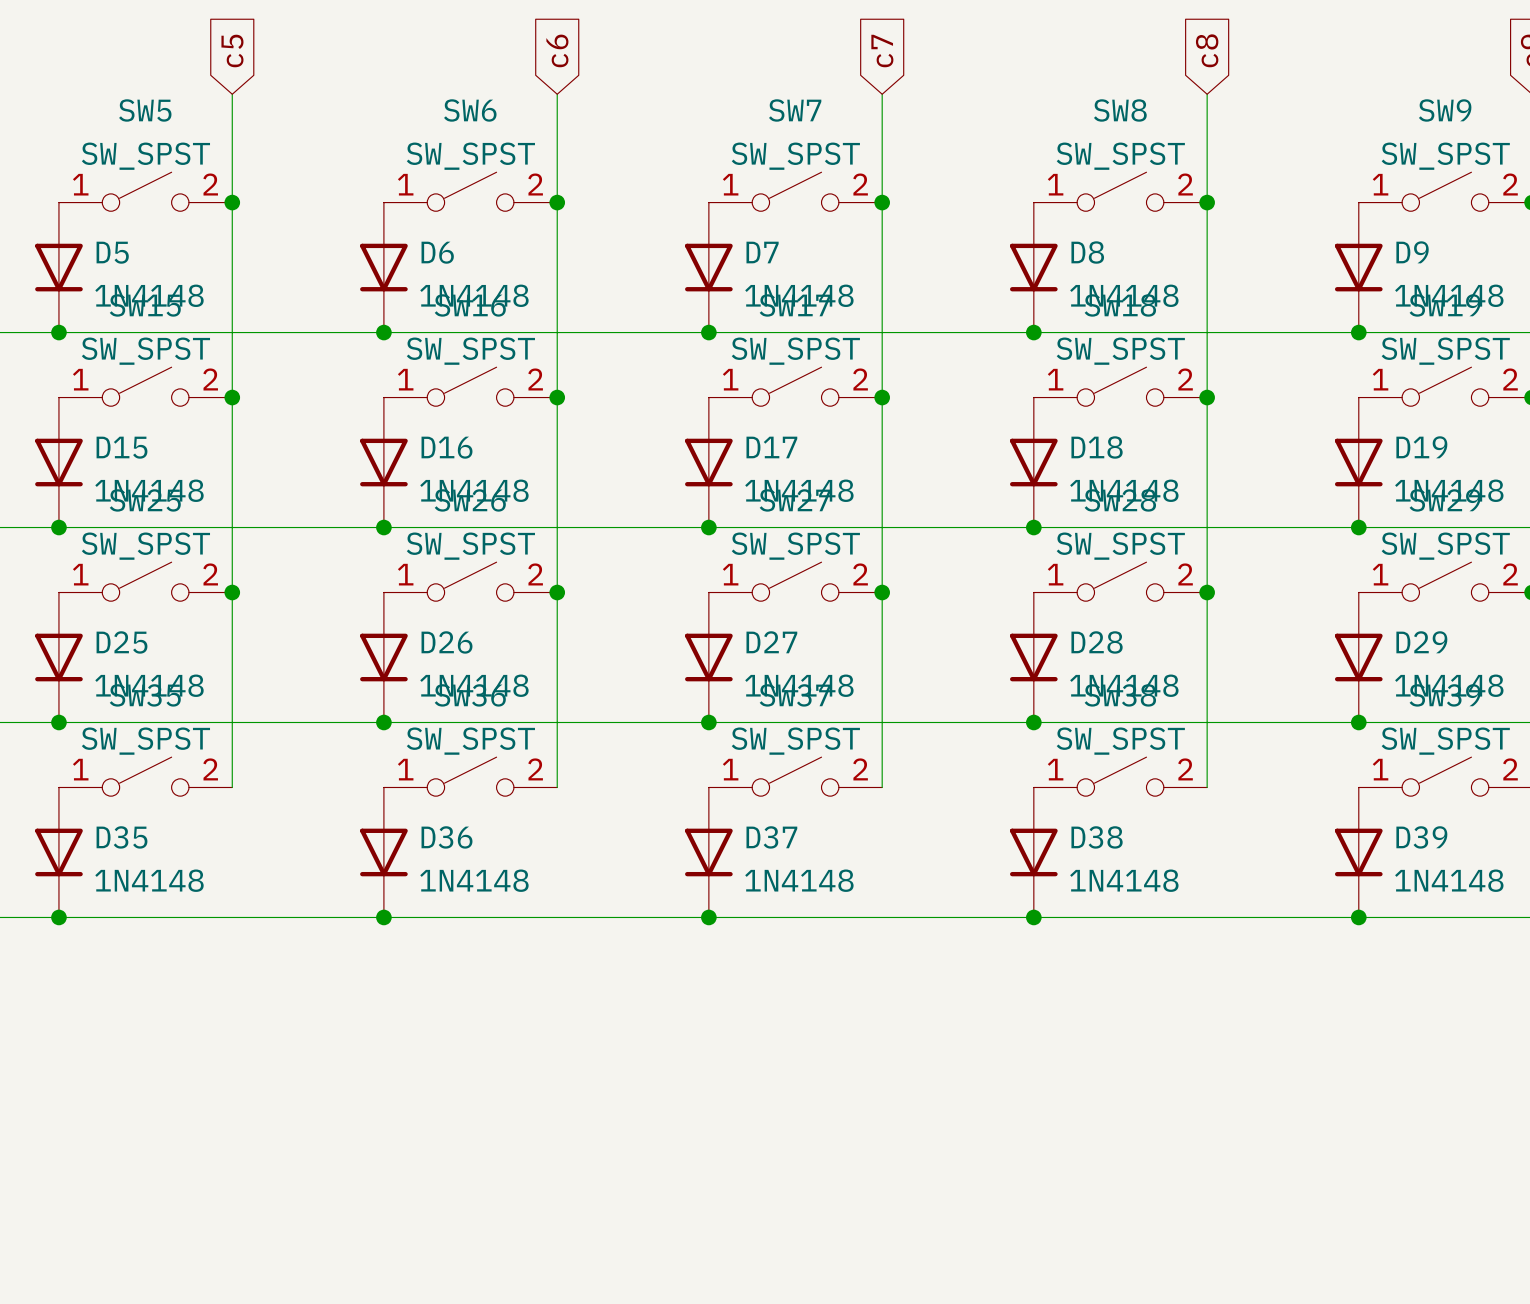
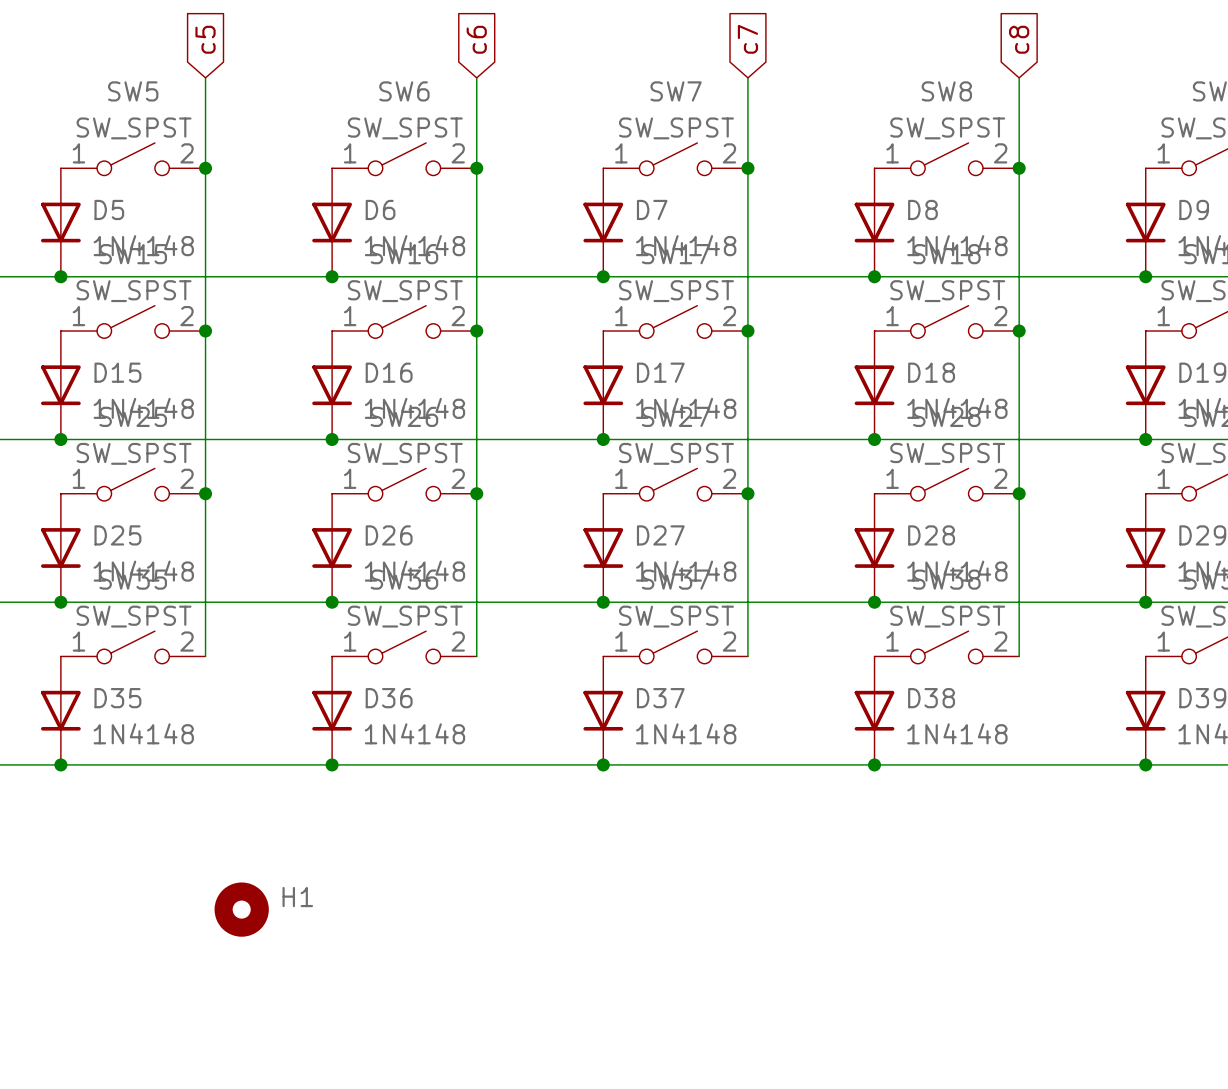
H1: none -> (241, 909)

